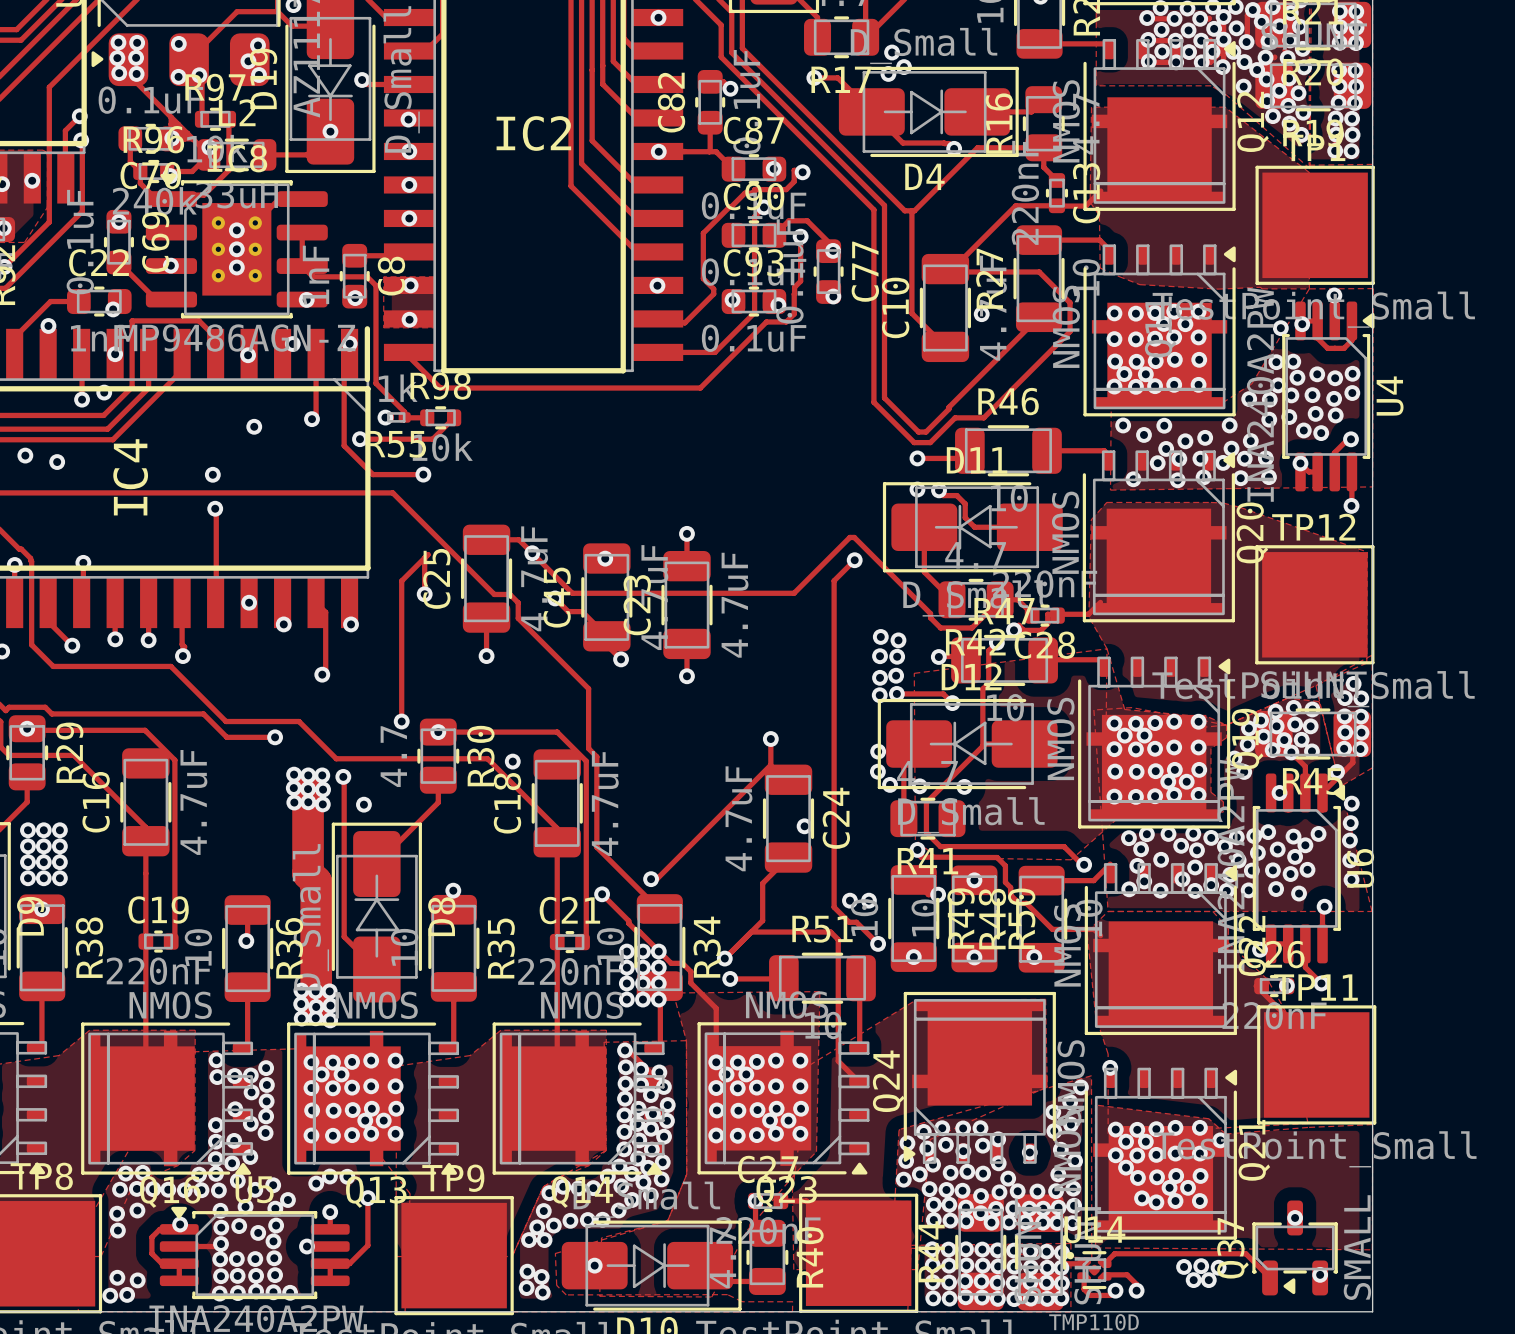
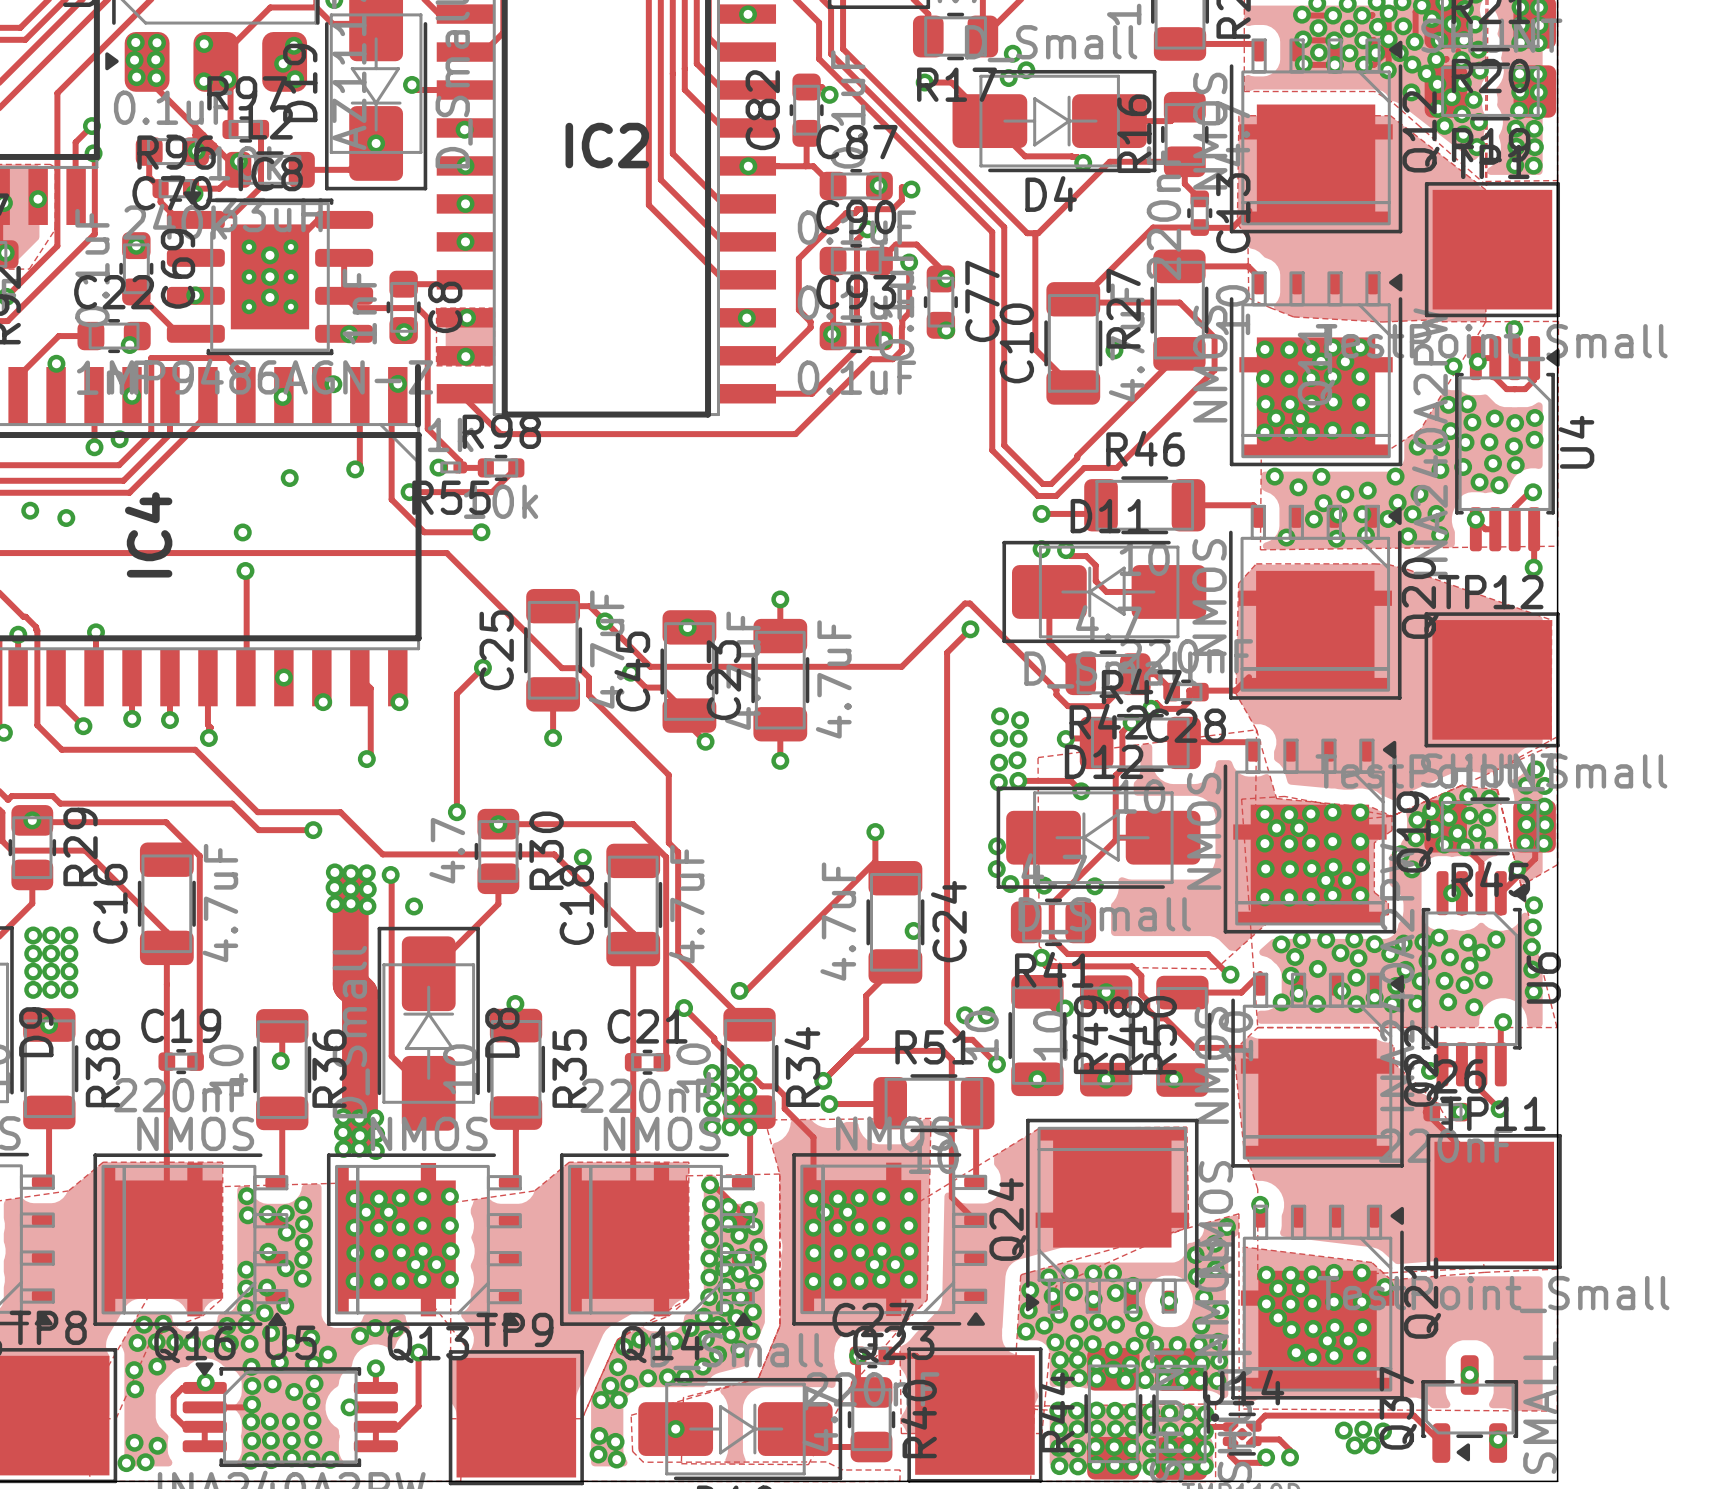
track: none -> (833, 261) (832, 334)
track: (428, 554) (401, 581) (401, 617) -> (482, 667) (456, 693)
track: (424, 558) (424, 594) -> none

